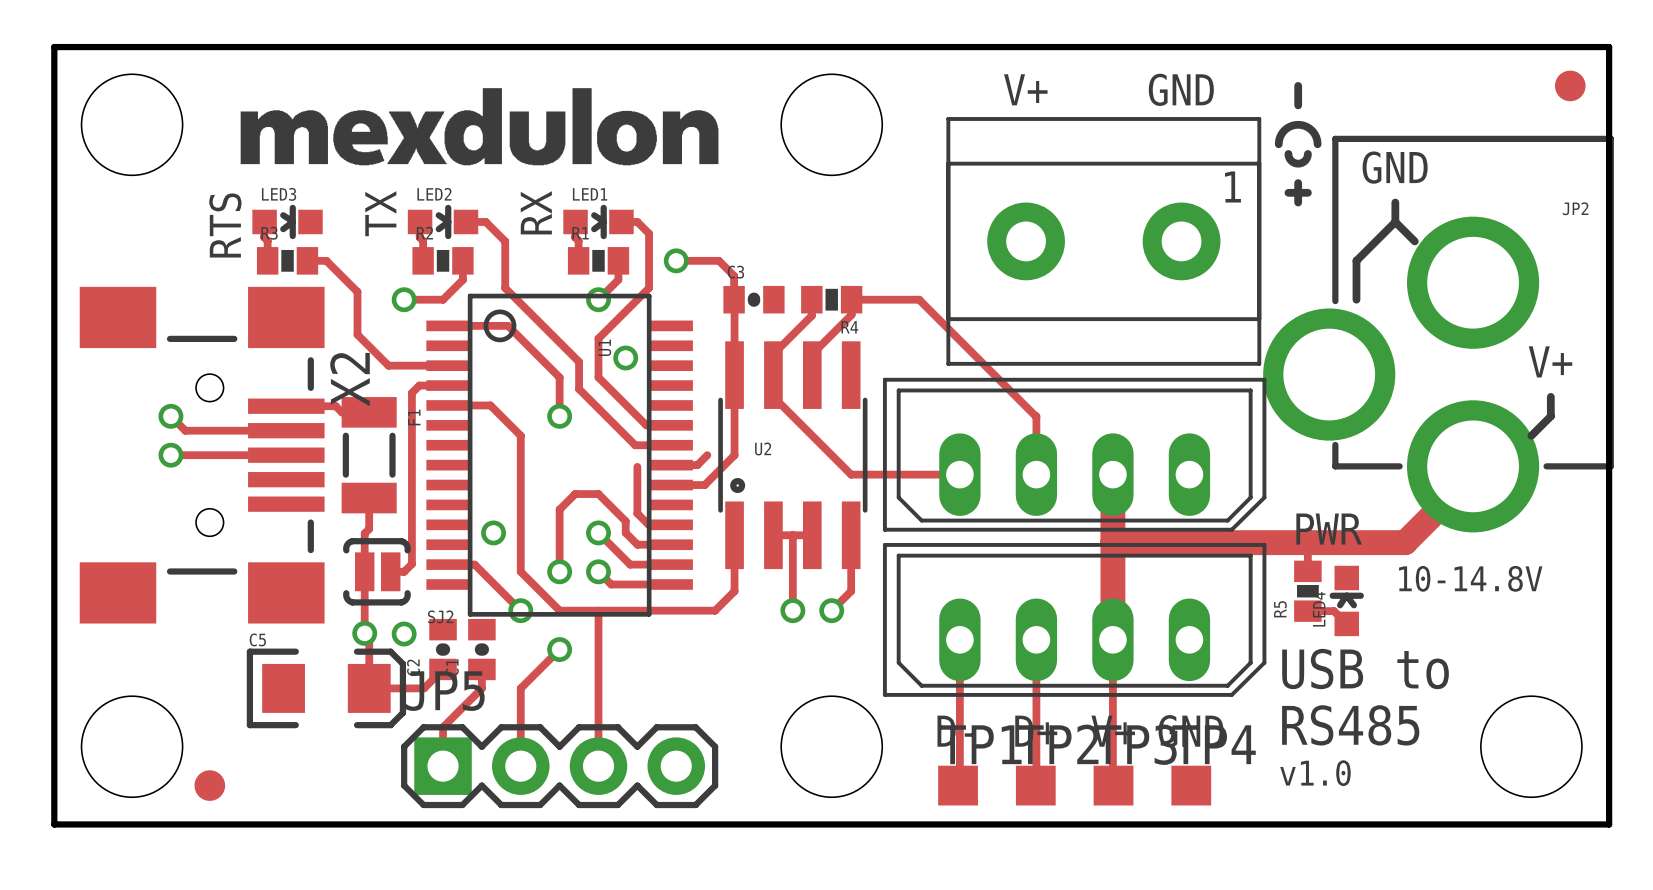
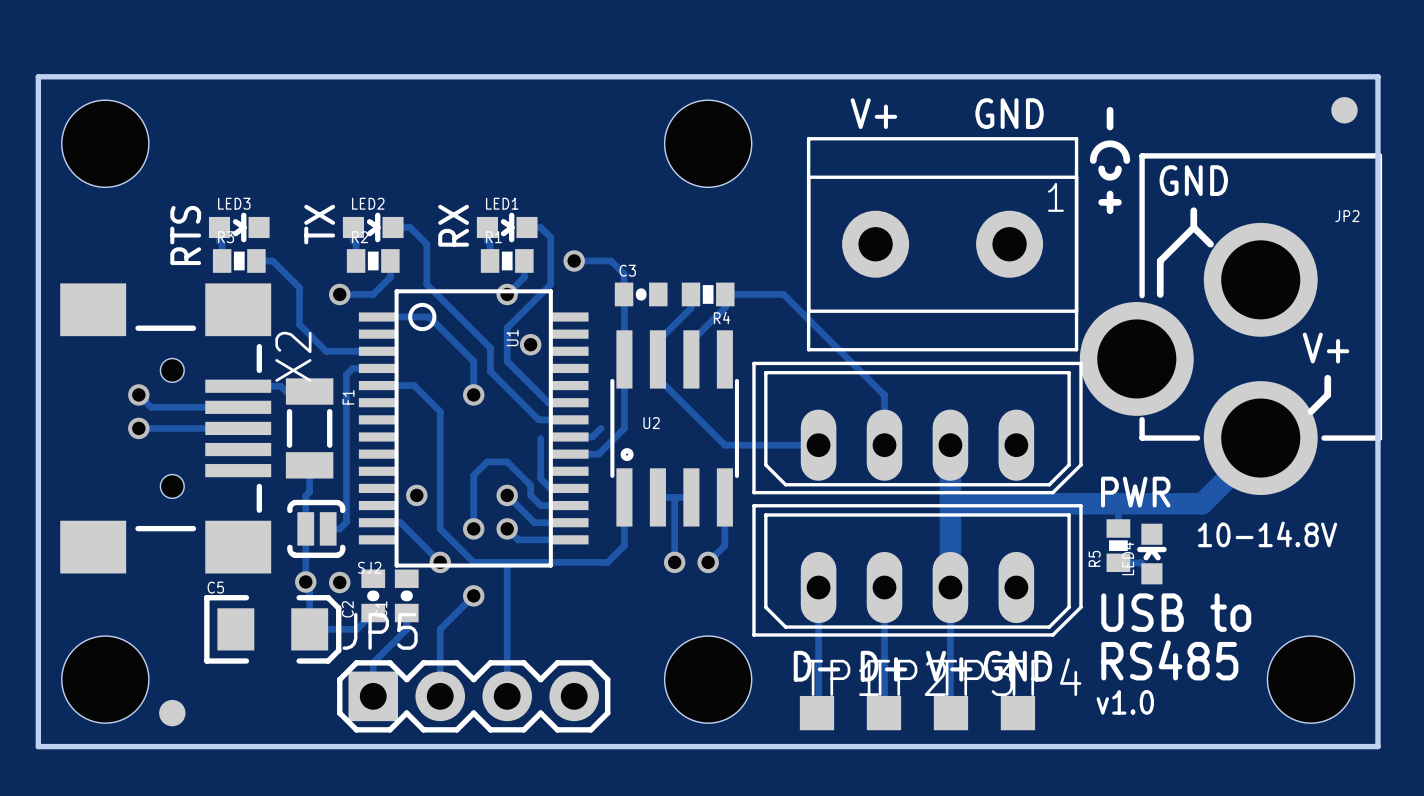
drawing: [240, 88, 719, 166] -> none

